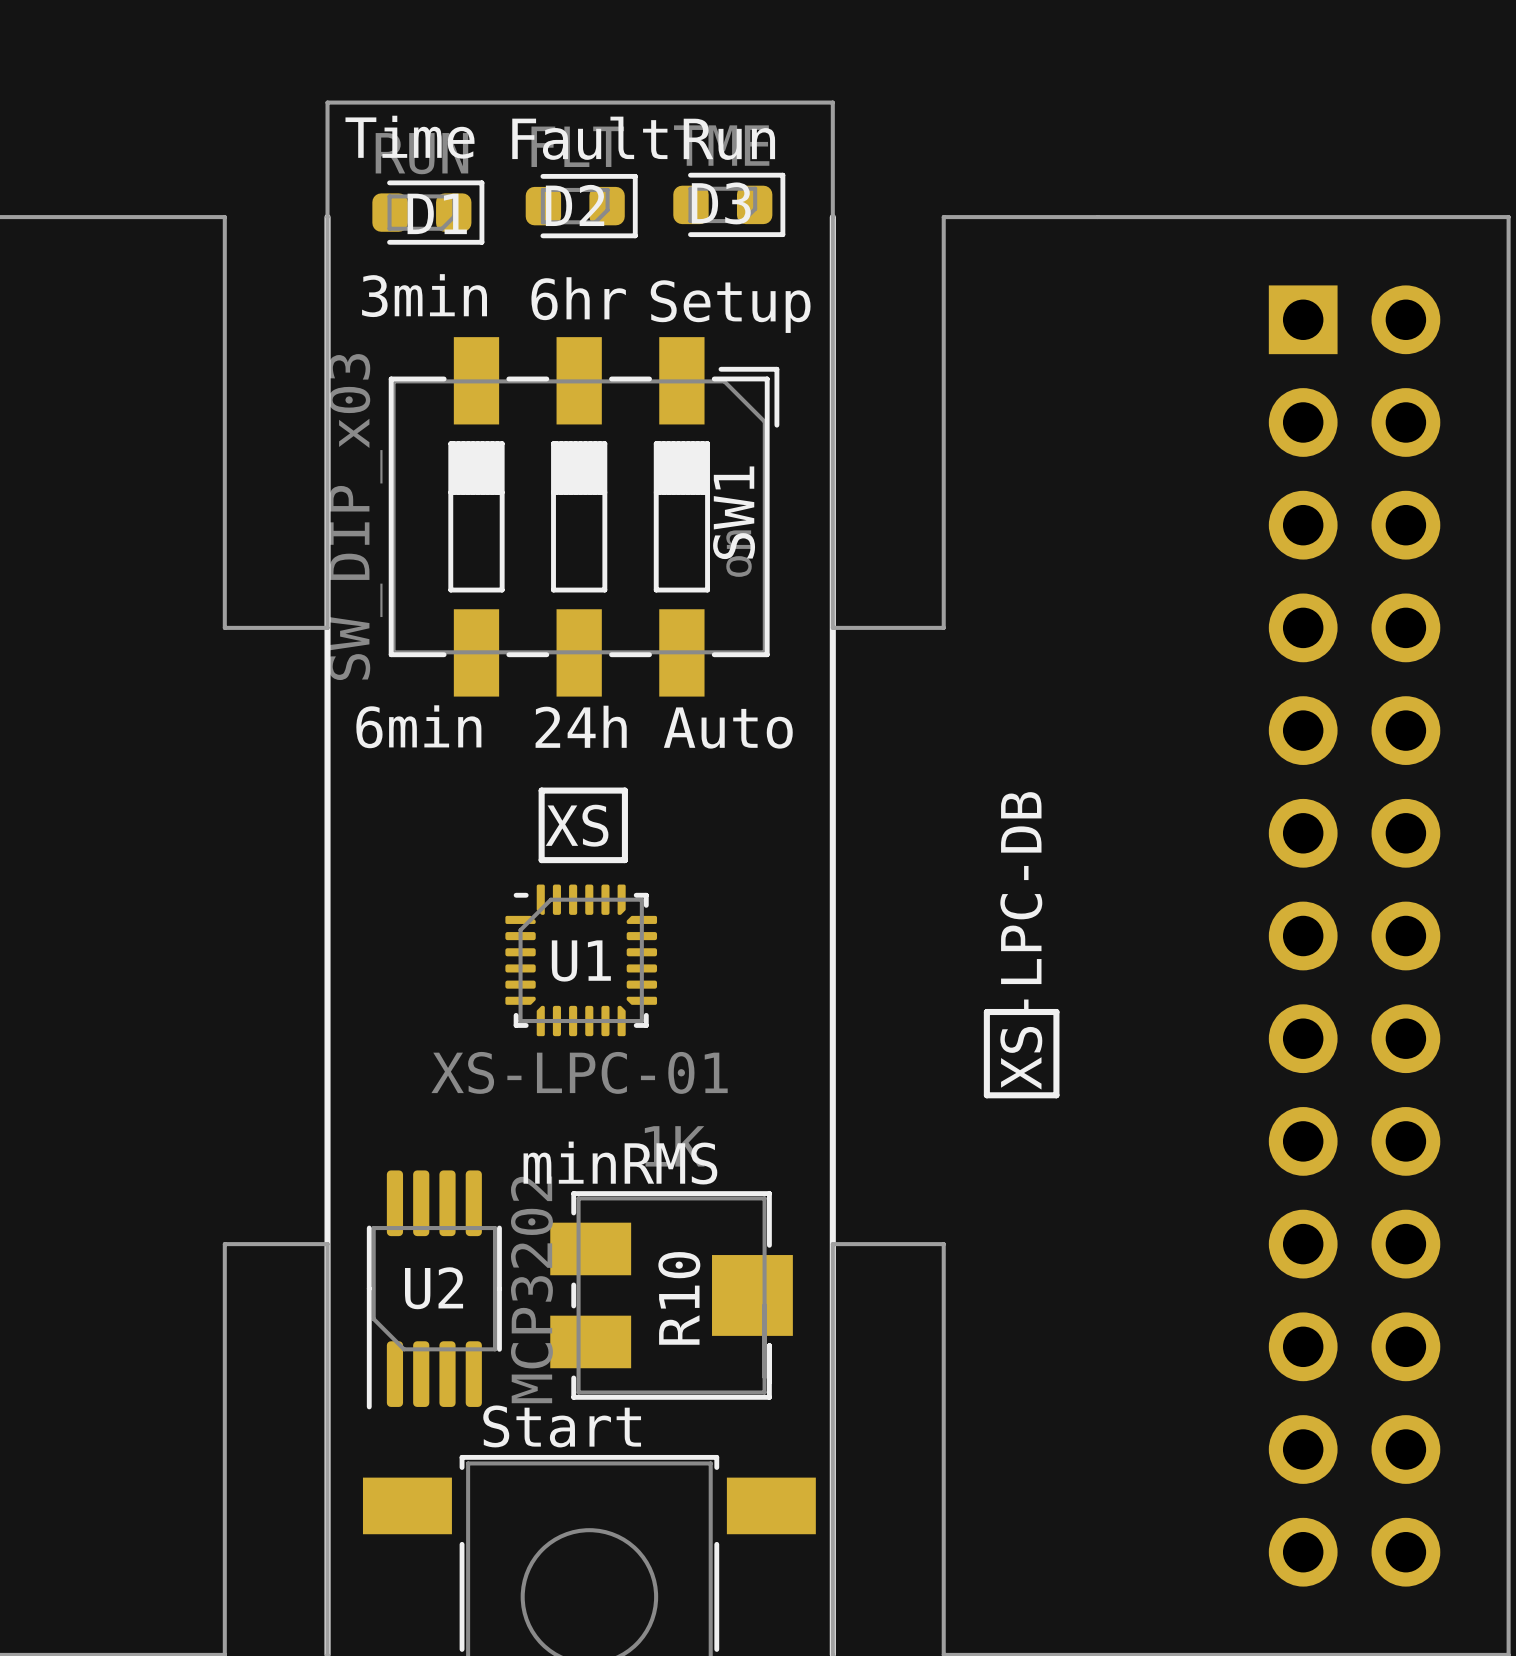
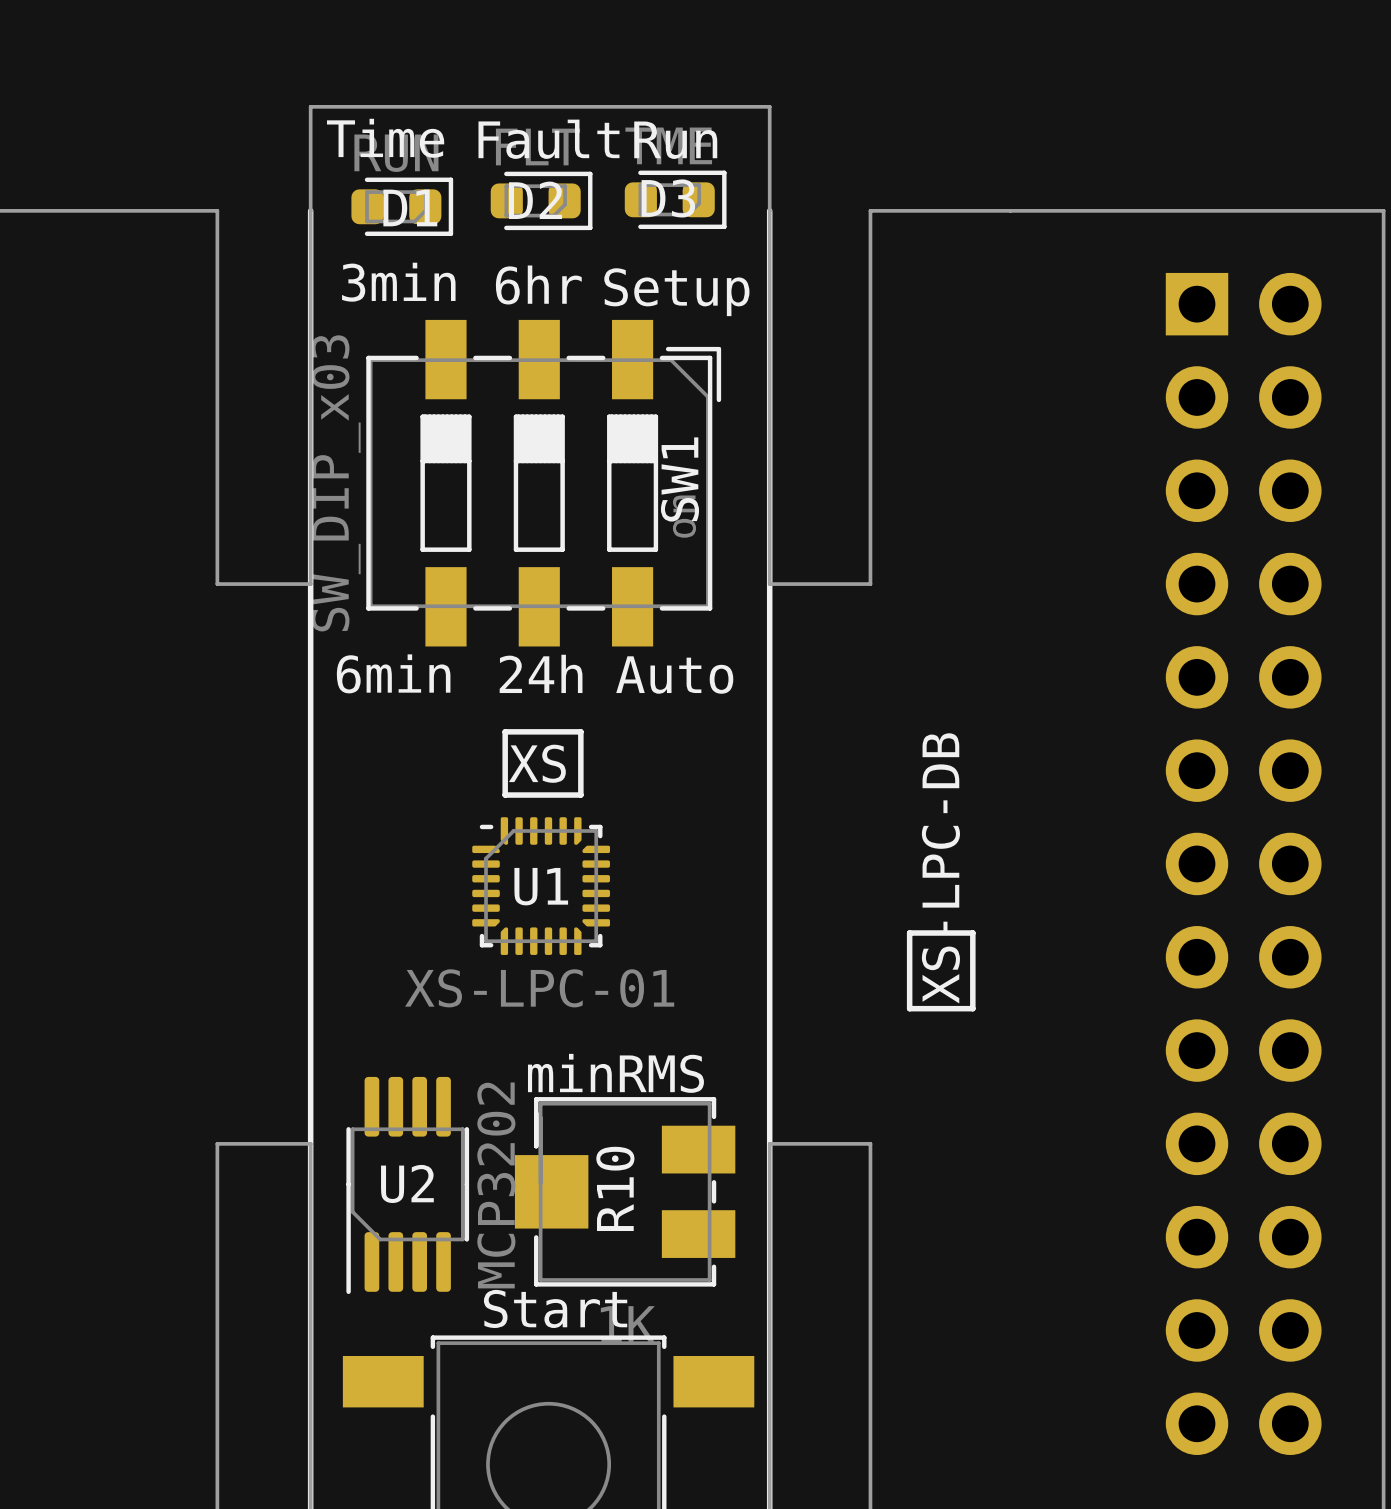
text position: minRMS (620, 1163) -> minRMS (615, 1073)
R10 rotation: 0° (671, 1295) -> 180° (625, 1191)
text position: Start (562, 1426) -> Start (555, 1308)

